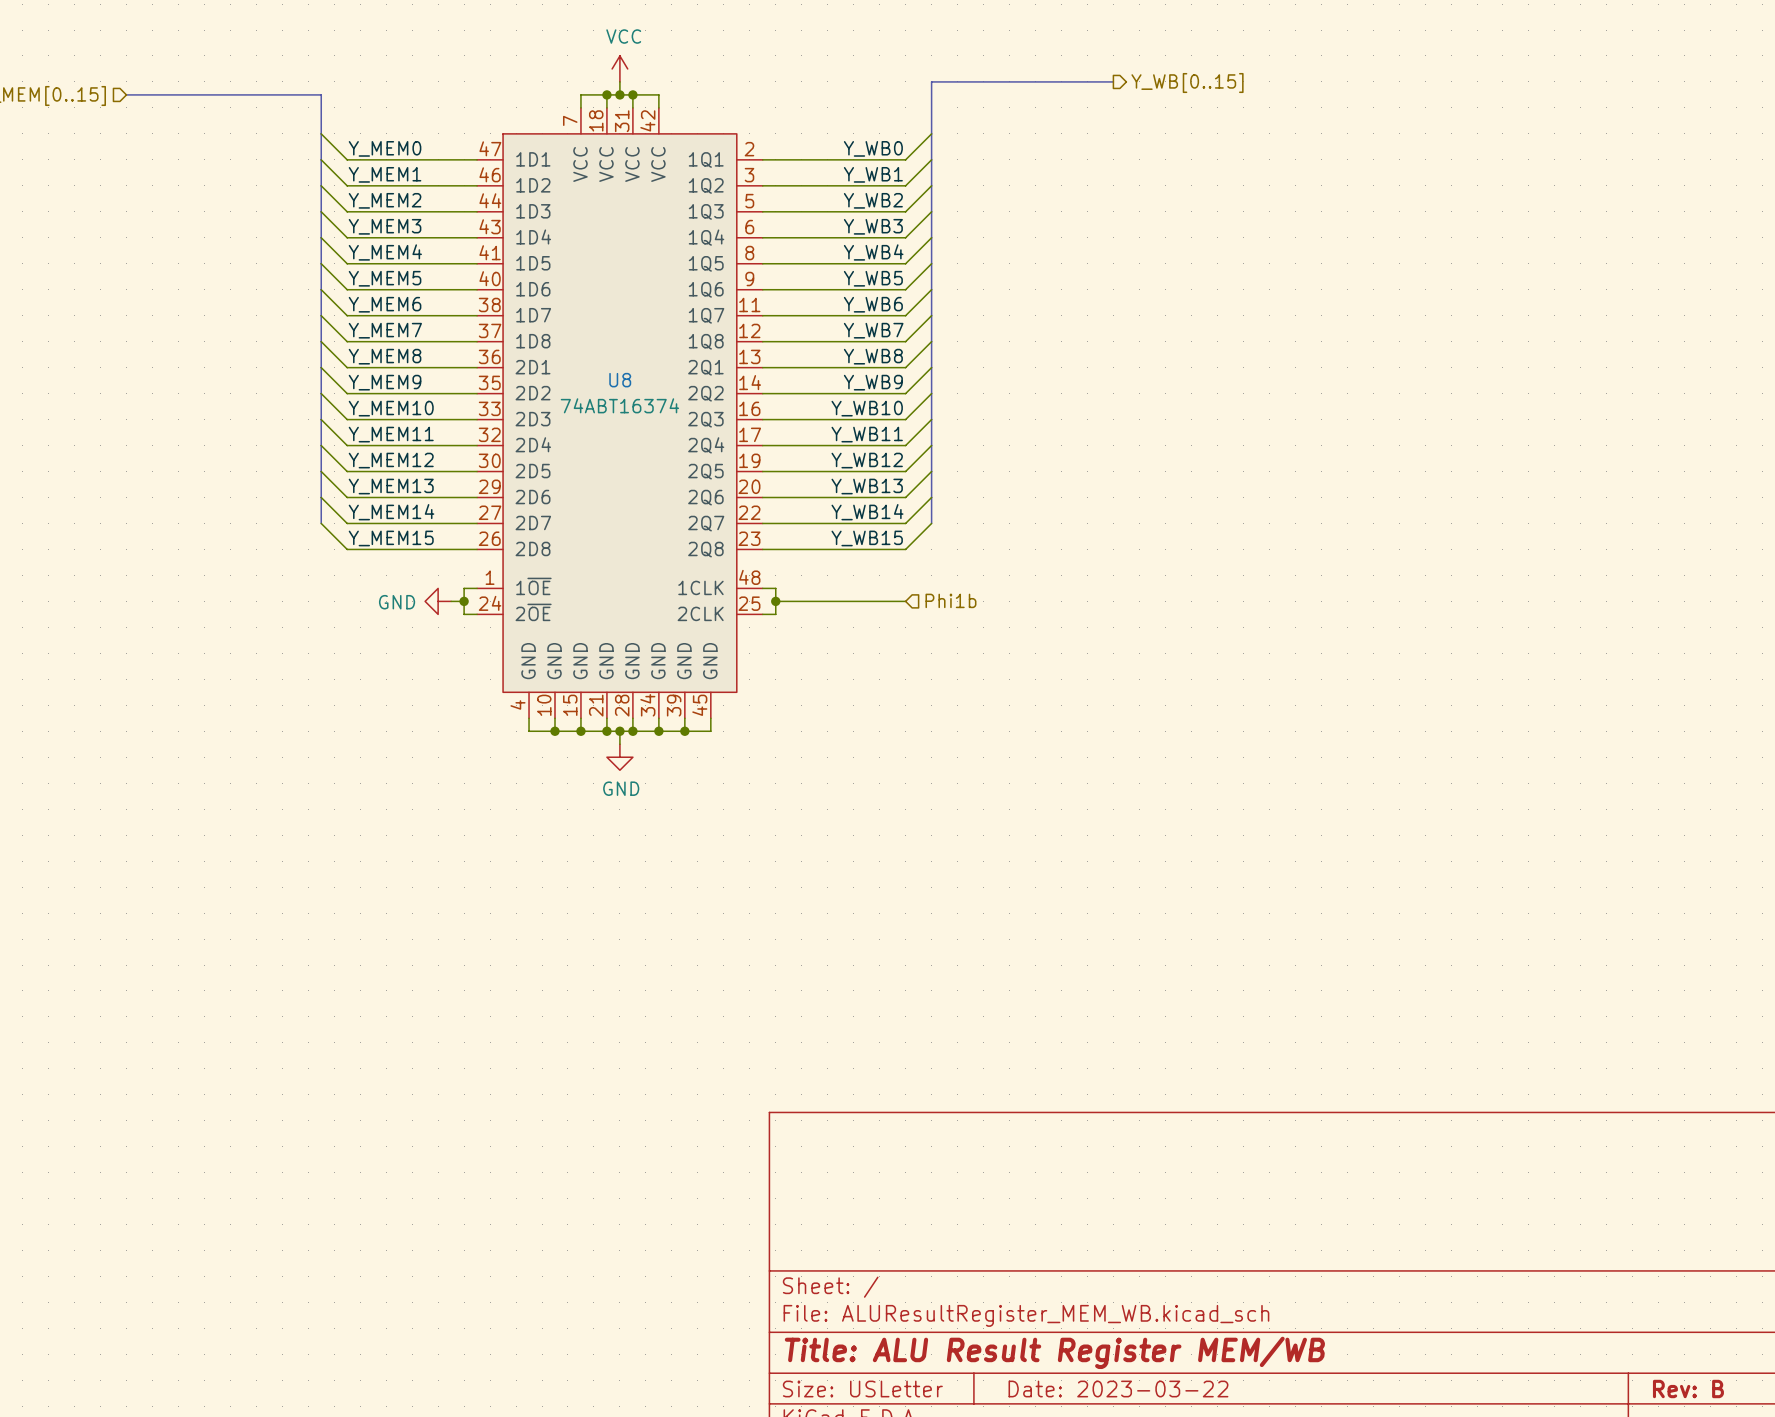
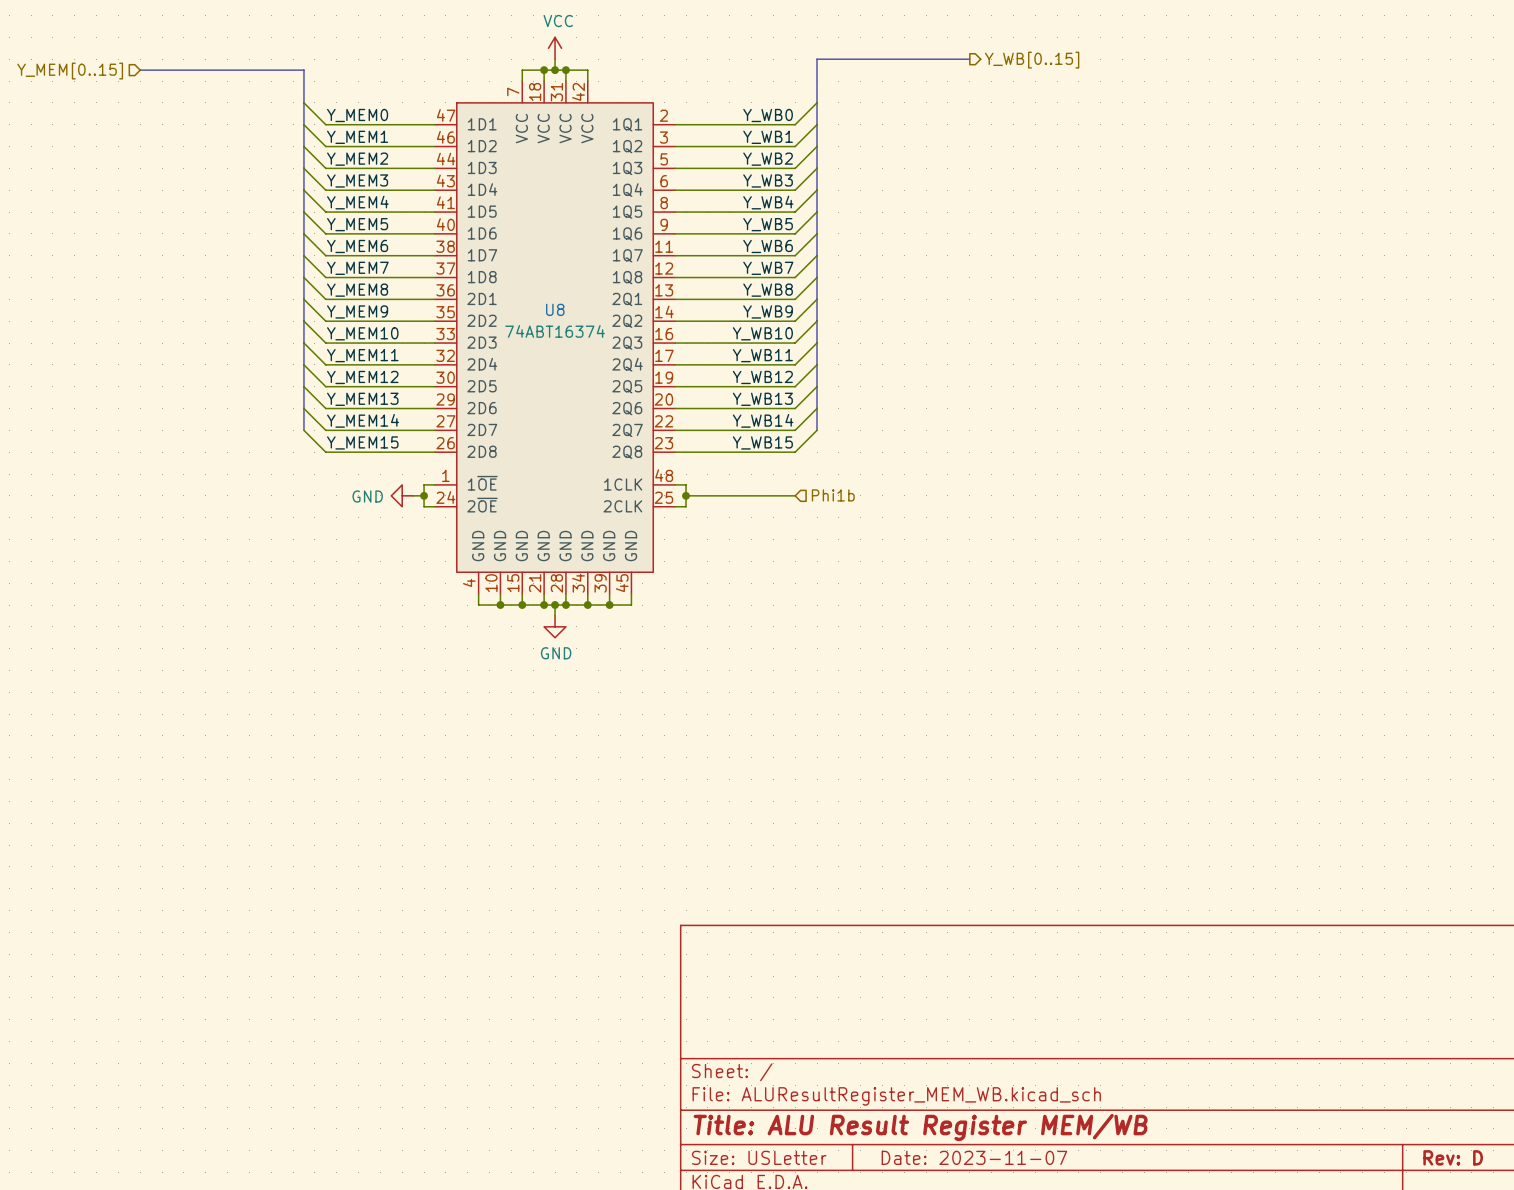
title block: Date: 2023-03-22 (1118, 1388) -> Date: 2023-11-07 (974, 1157)
title block: Rev: B (1688, 1388) -> Rev: D (1453, 1157)

